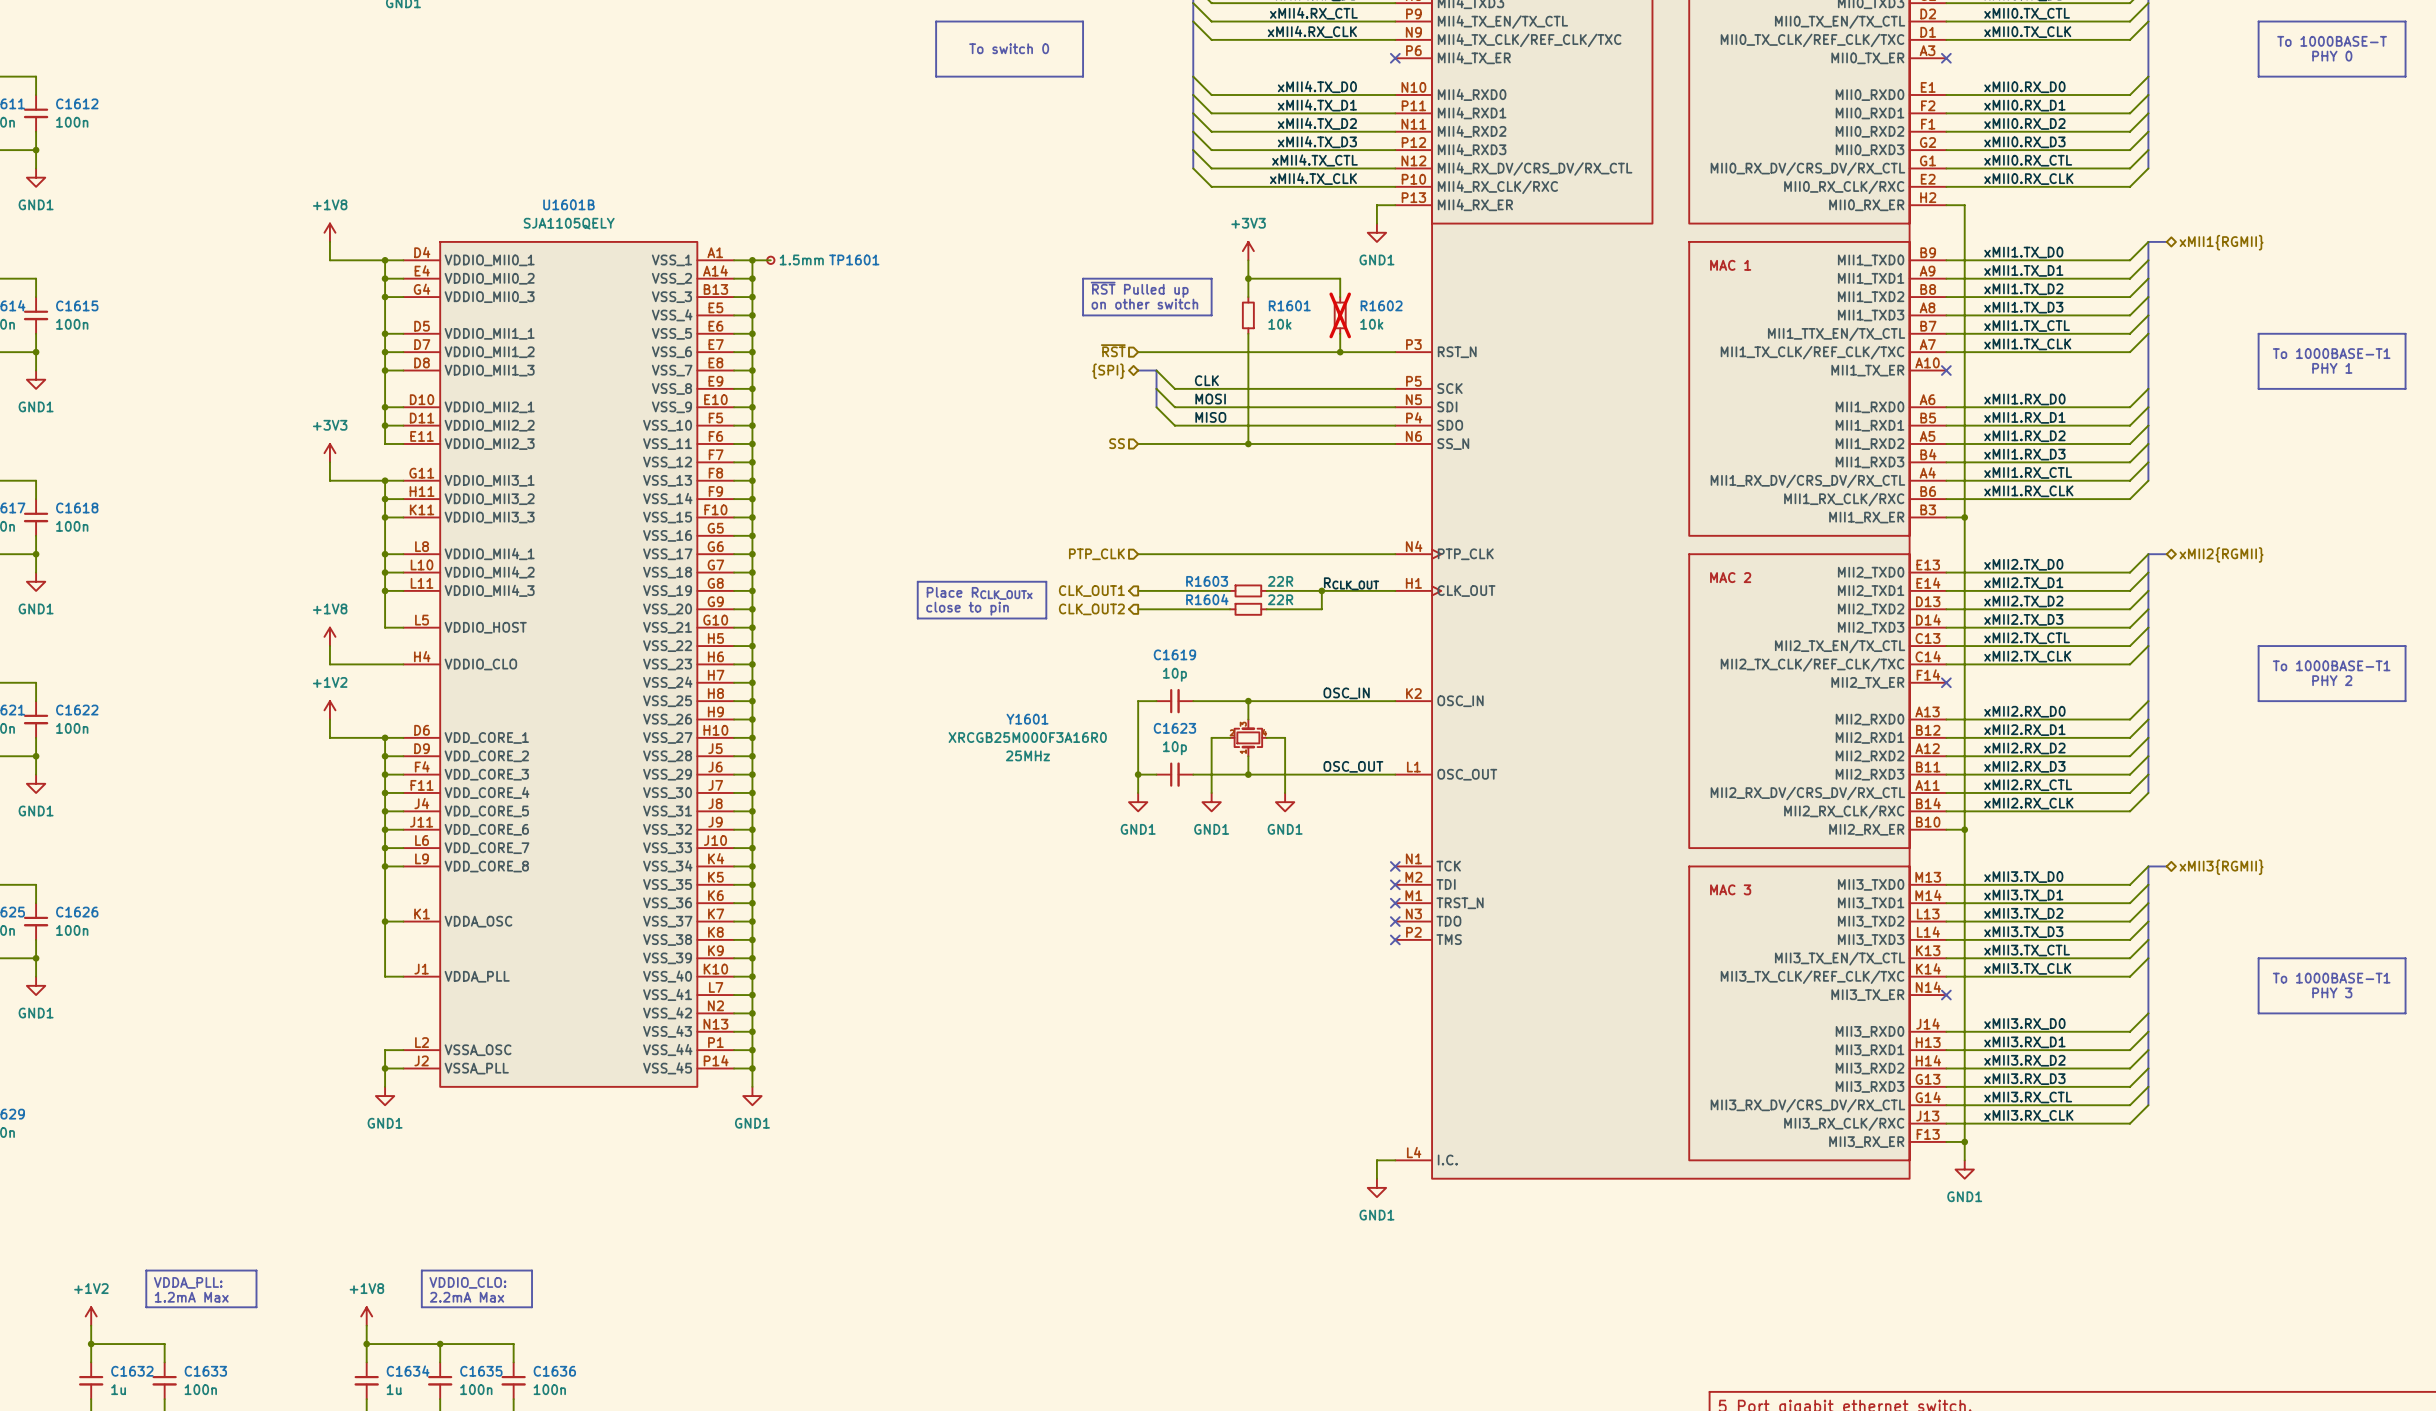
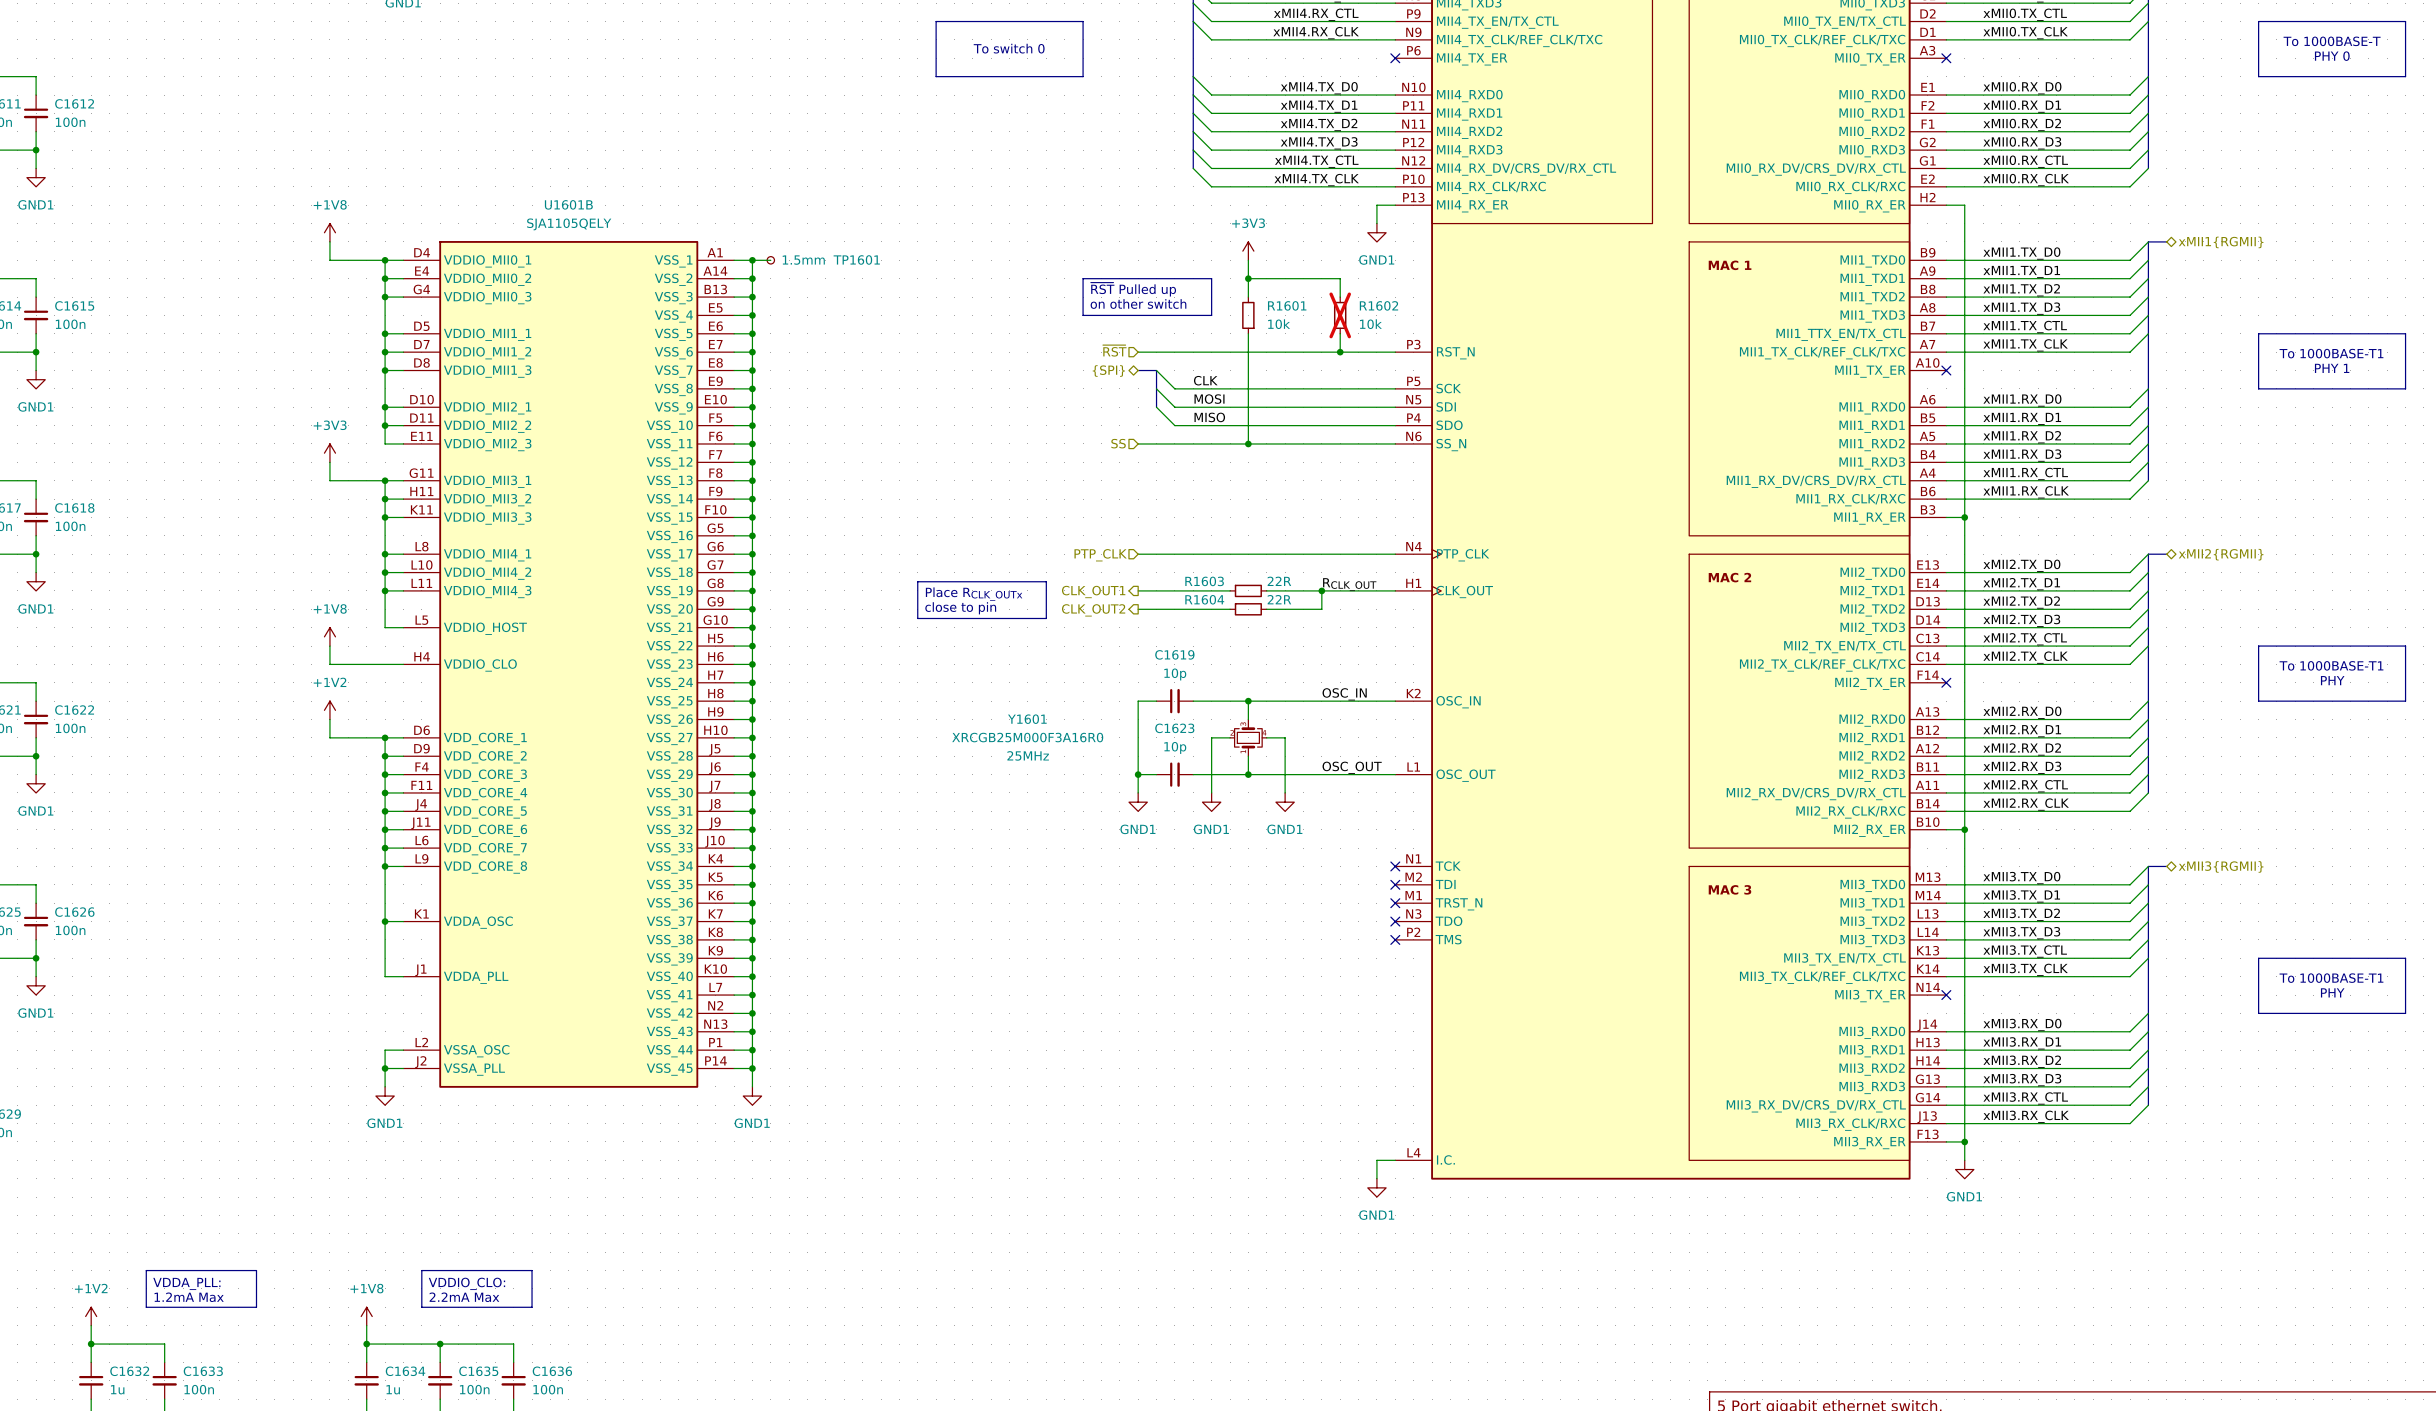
text: PHY 2 (2332, 680) -> PHY (2332, 680)
text: PHY 3 (2332, 992) -> PHY (2332, 992)

